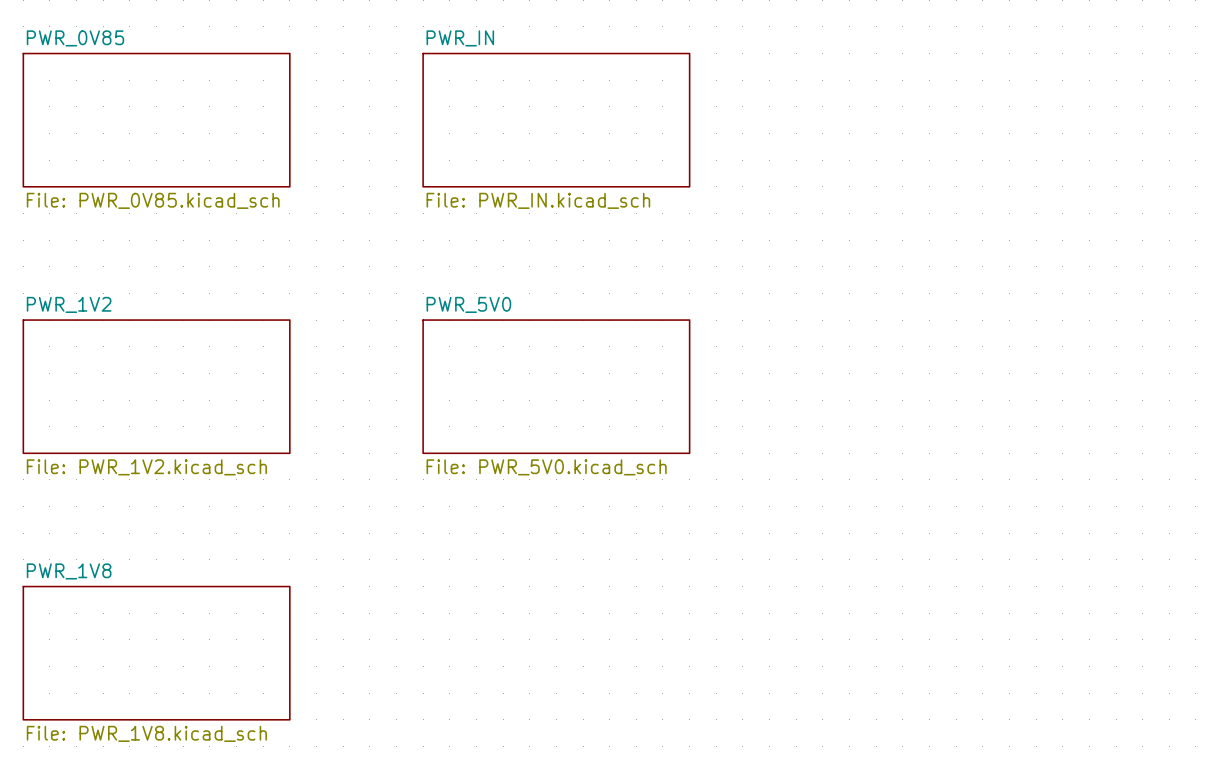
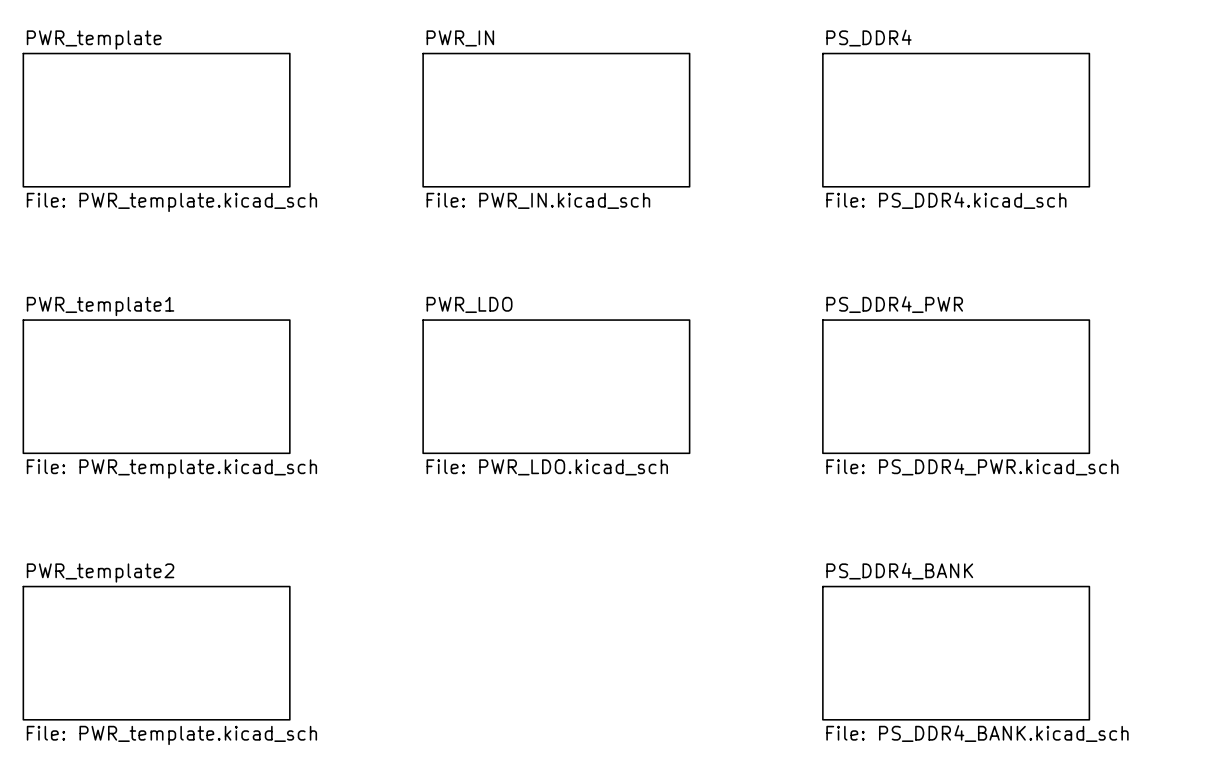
sheet PWR_0V85 name: PWR_0V85 (75, 38) -> PWR_template (94, 39)
sheet PS_DDR4: none -> File: PS_DDR4.kicad_sch (956, 120)
sheet PWR_0V85 value: File: PWR_0V85.kicad_sch (153, 200) -> File: PWR_template.kicad_sch (171, 202)
sheet PWR_1V2 name: PWR_1V2 (69, 304) -> PWR_template1 (100, 306)
sheet PWR_5V0 name: PWR_5V0 (468, 304) -> PWR_LDO (469, 304)
sheet PS_DDR4_PWR: none -> File: PS_DDR4_PWR.kicad_sch (956, 386)
sheet PWR_1V2 value: File: PWR_1V2.kicad_sch (146, 467) -> File: PWR_template.kicad_sch (171, 468)
sheet PWR_5V0 value: File: PWR_5V0.kicad_sch (546, 467) -> File: PWR_LDO.kicad_sch (547, 467)
sheet PWR_1V8 name: PWR_1V8 (69, 571) -> PWR_template2 (100, 573)
sheet PS_DDR4_BANK: none -> File: PS_DDR4_BANK.kicad_sch (956, 653)
sheet PWR_1V8 value: File: PWR_1V8.kicad_sch (146, 733) -> File: PWR_template.kicad_sch (171, 735)

